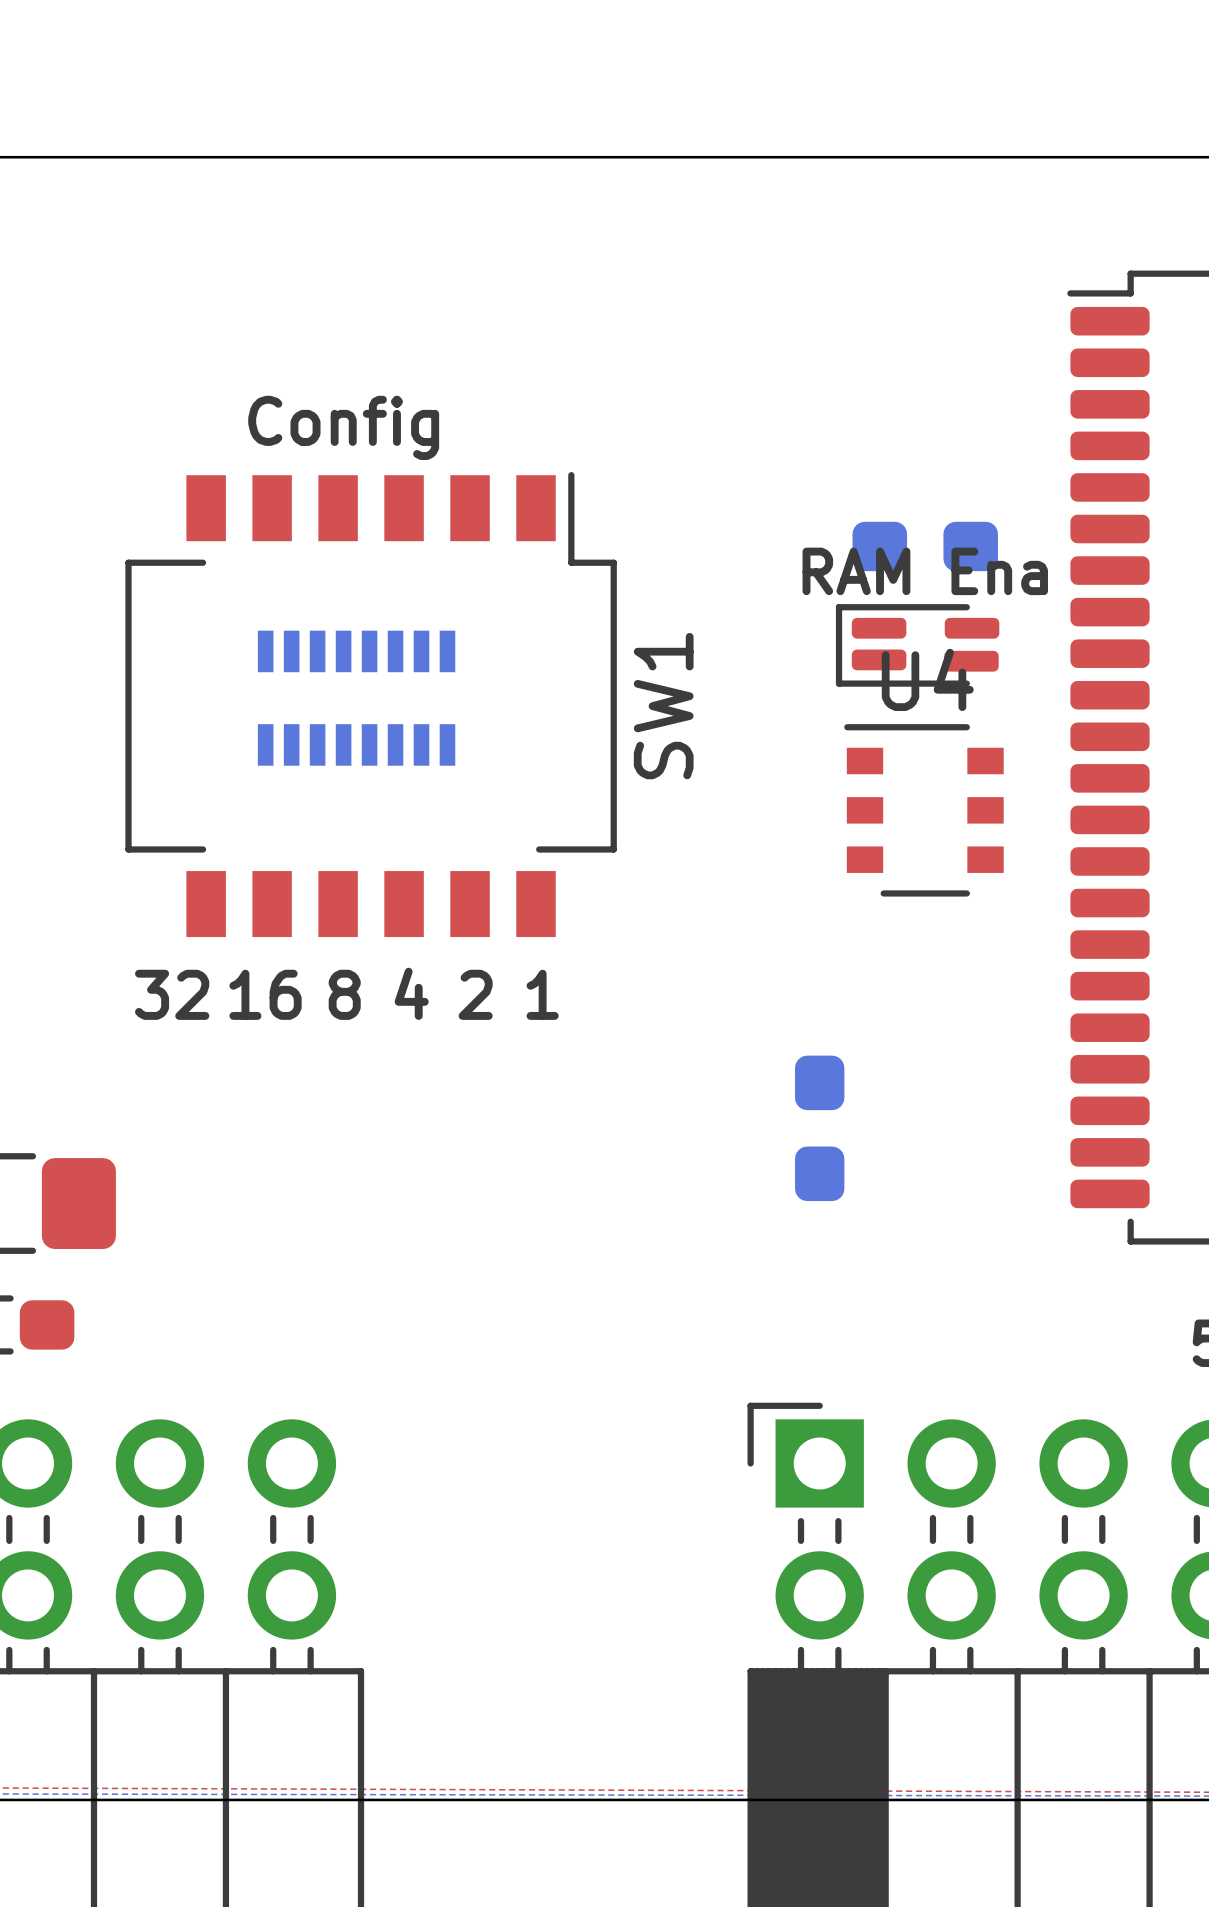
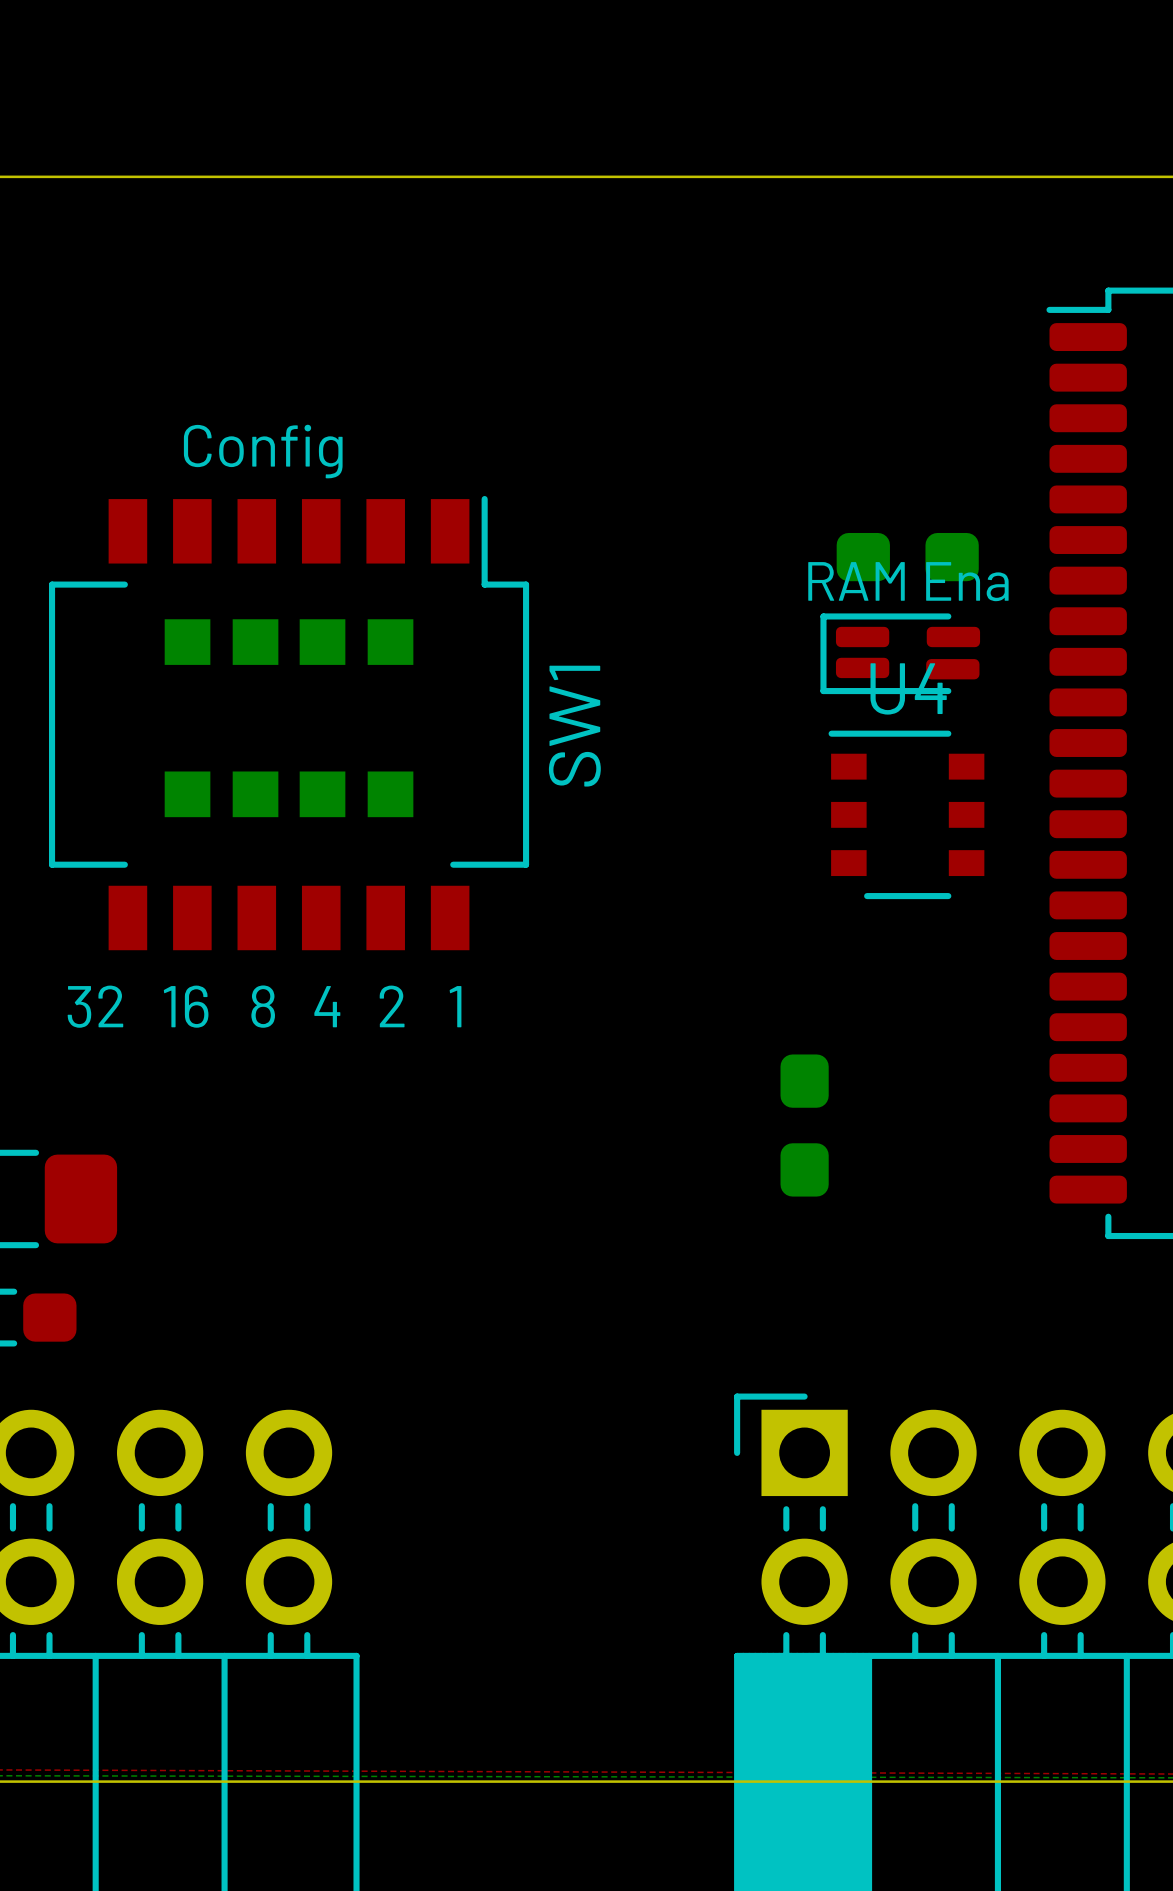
text position: Config (343, 427) -> Config (263, 451)
part: (356, 698) -> none
SW1 position: (371, 704) -> (289, 723)
part: none -> (289, 718)
text: 4 (411, 993) -> 2 (392, 1006)
text: 32 (172, 994) -> 16 (186, 1006)
text: 16 (265, 994) -> 8 (263, 1006)
text: 8 (344, 994) -> 4 (327, 1006)
text: 2 (475, 994) -> 1 (455, 1006)
text: 1 (542, 994) -> none
text: none -> 32 (95, 1006)

